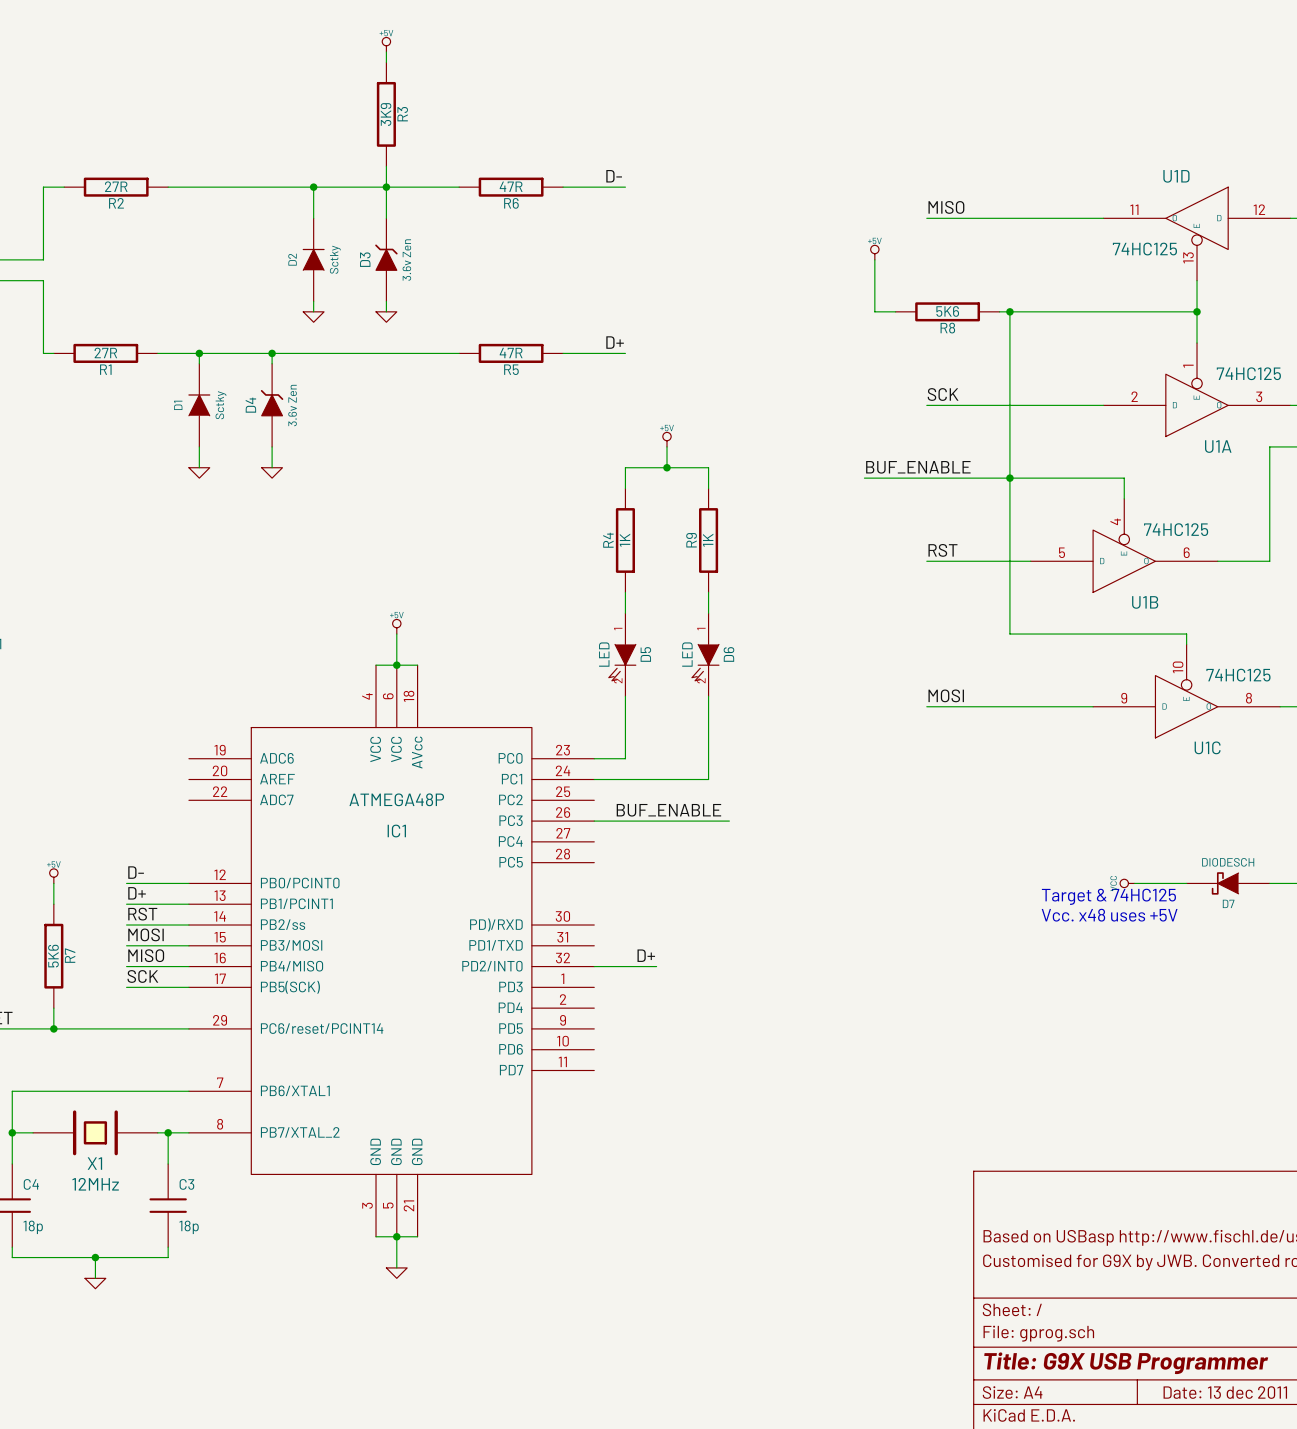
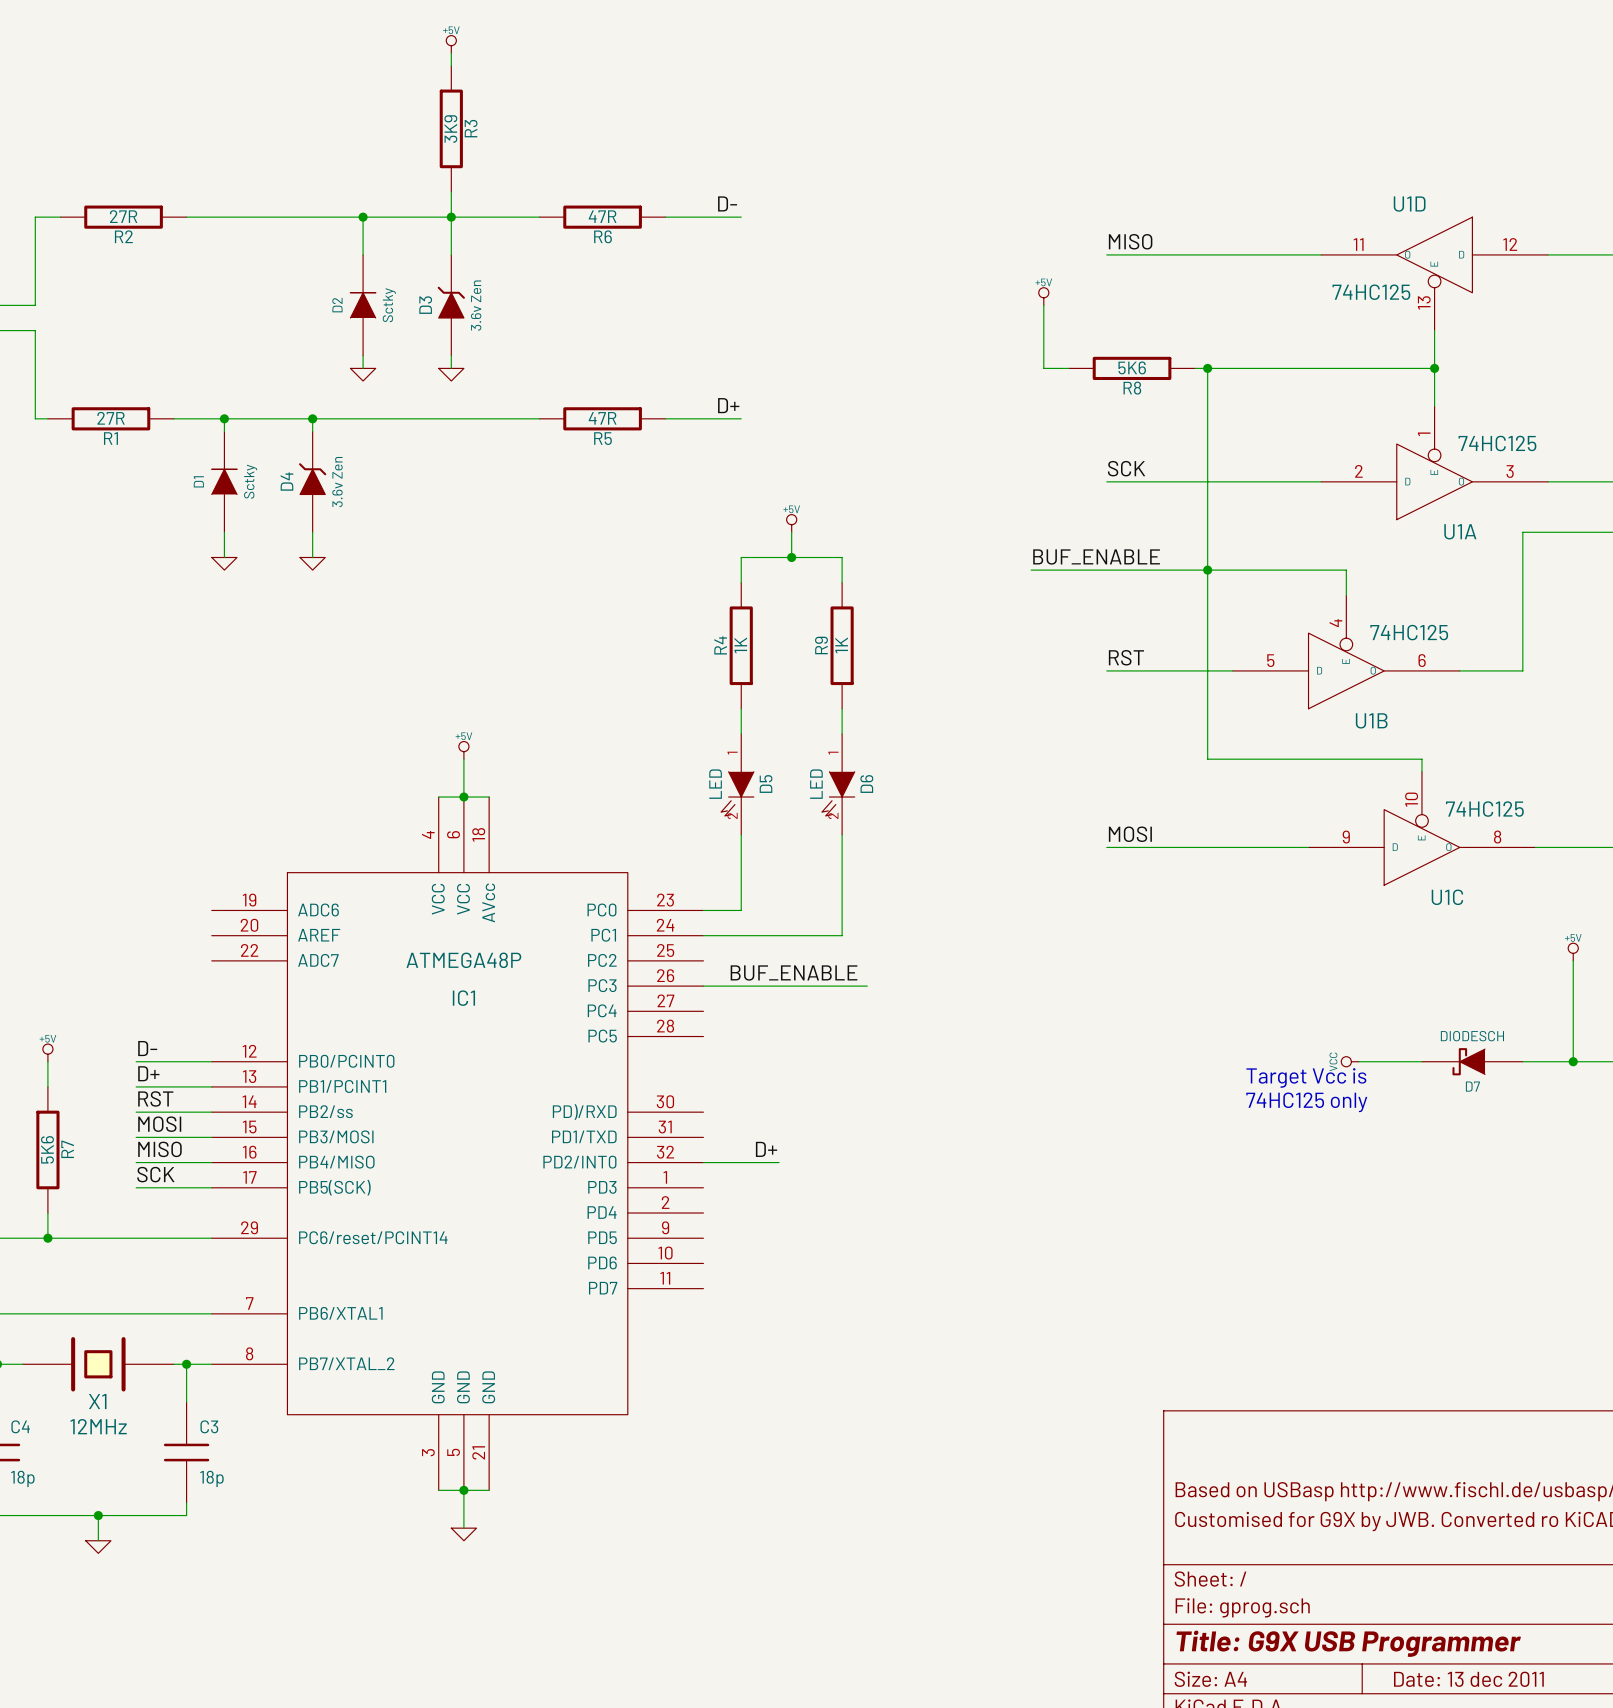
text: Target & 74HC125 (1108, 896) -> Target Vcc is (1306, 1077)
text: Vcc. x48 uses +5V (1109, 915) -> 74HC125 only (1306, 1102)

